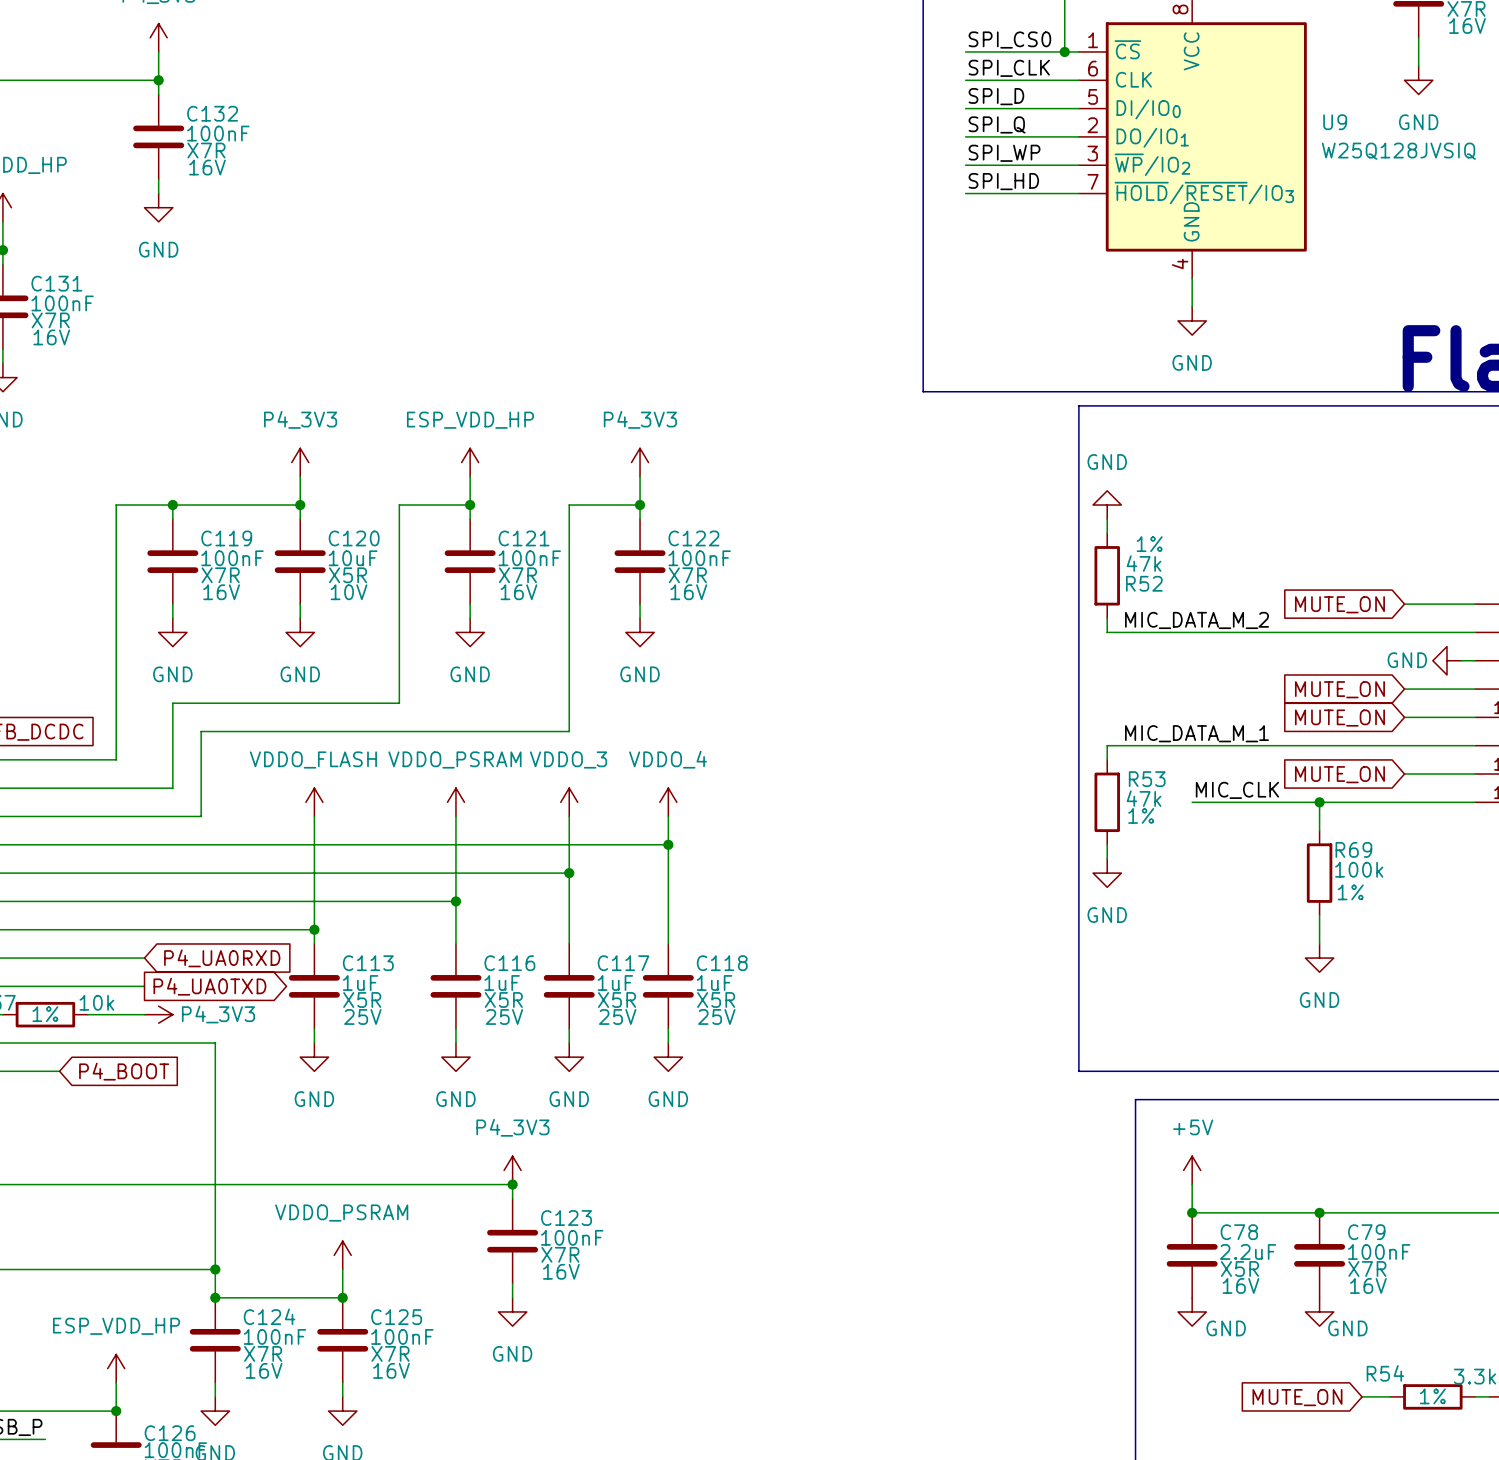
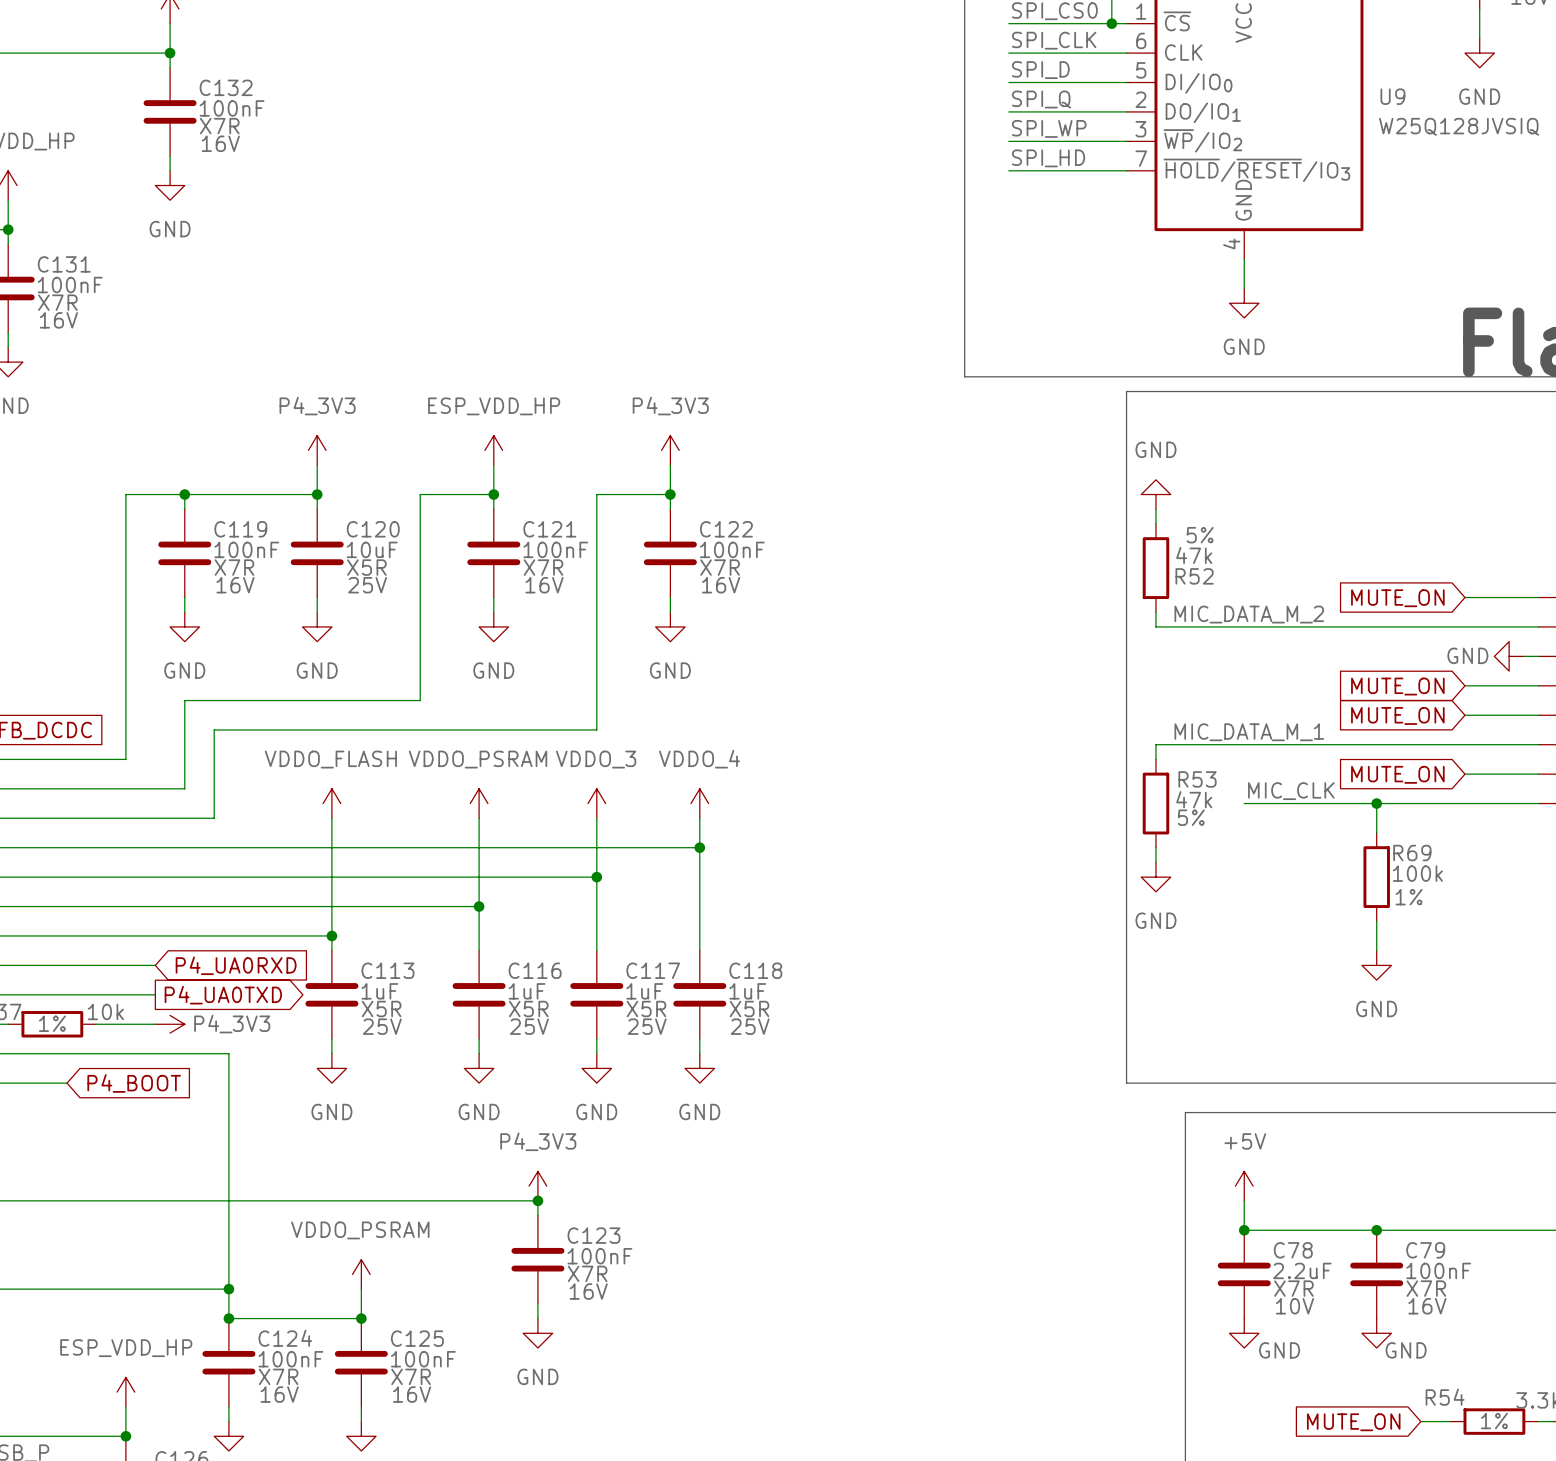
R52 text: 1% (1149, 544) -> 5% (1200, 535)
C120 text: 10V (349, 592) -> 25V (367, 585)
R53 text: 1% (1141, 815) -> 5% (1191, 817)
C78 text: X5R (1239, 1268) -> X7R (1293, 1288)
C78 text: 16V (1240, 1285) -> 10V (1294, 1306)

